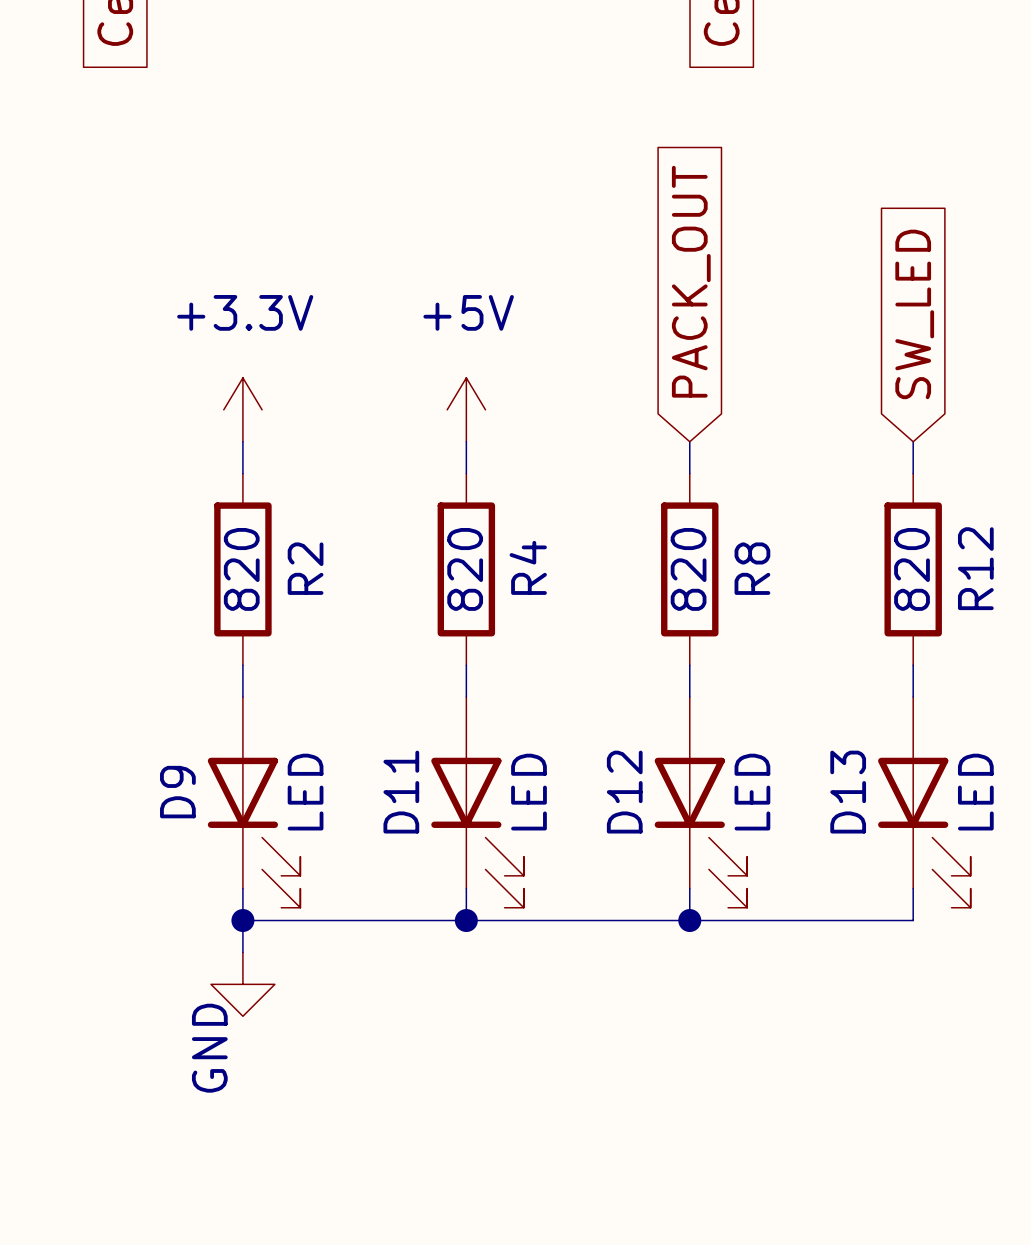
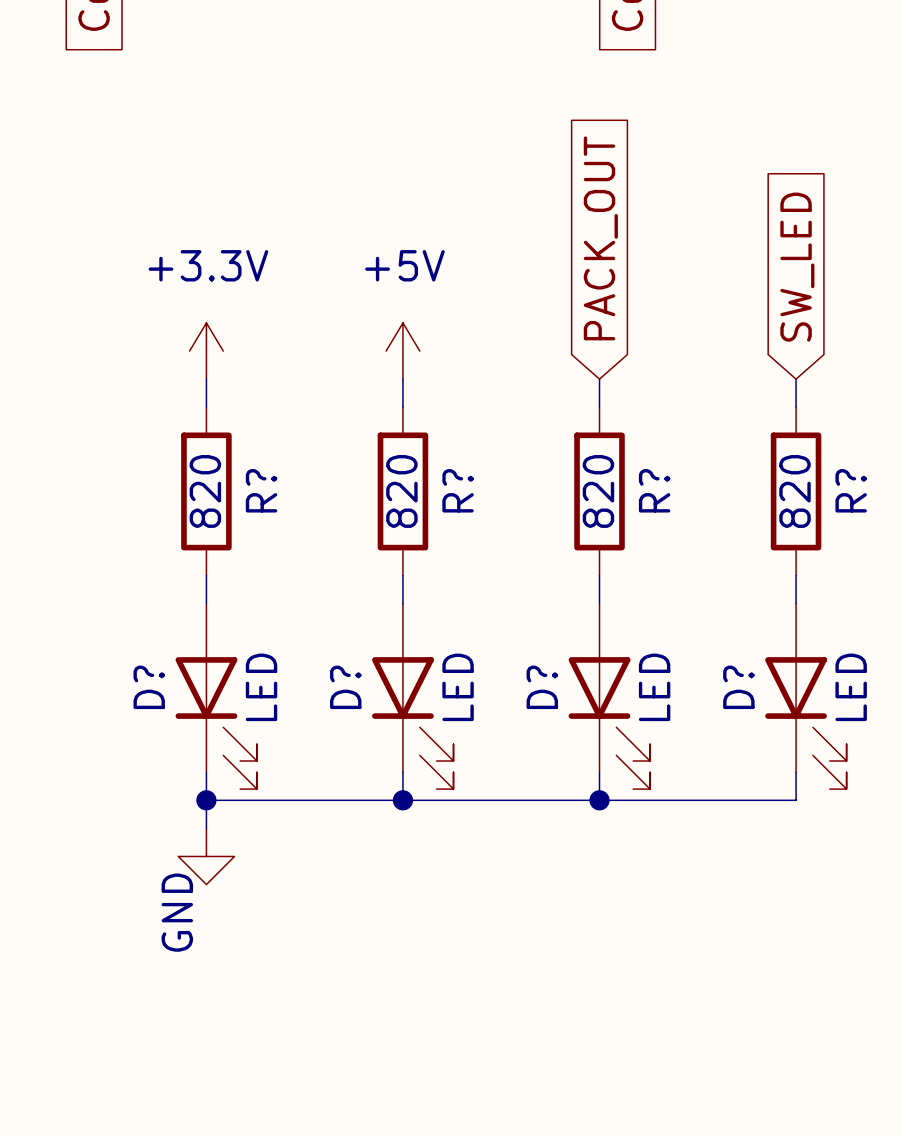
R4 name: R4 (528, 567) -> R? (458, 490)
R2 name: R2 (305, 568) -> R? (261, 490)
R8 name: R8 (752, 568) -> R? (654, 490)
R12 name: R12 (975, 568) -> R? (851, 490)
D9 name: D9 (177, 792) -> D? (149, 687)
D11 name: D11 (401, 792) -> D? (345, 687)
D12 name: D12 (624, 792) -> D? (542, 687)
D13 name: D13 (848, 792) -> D? (738, 687)

